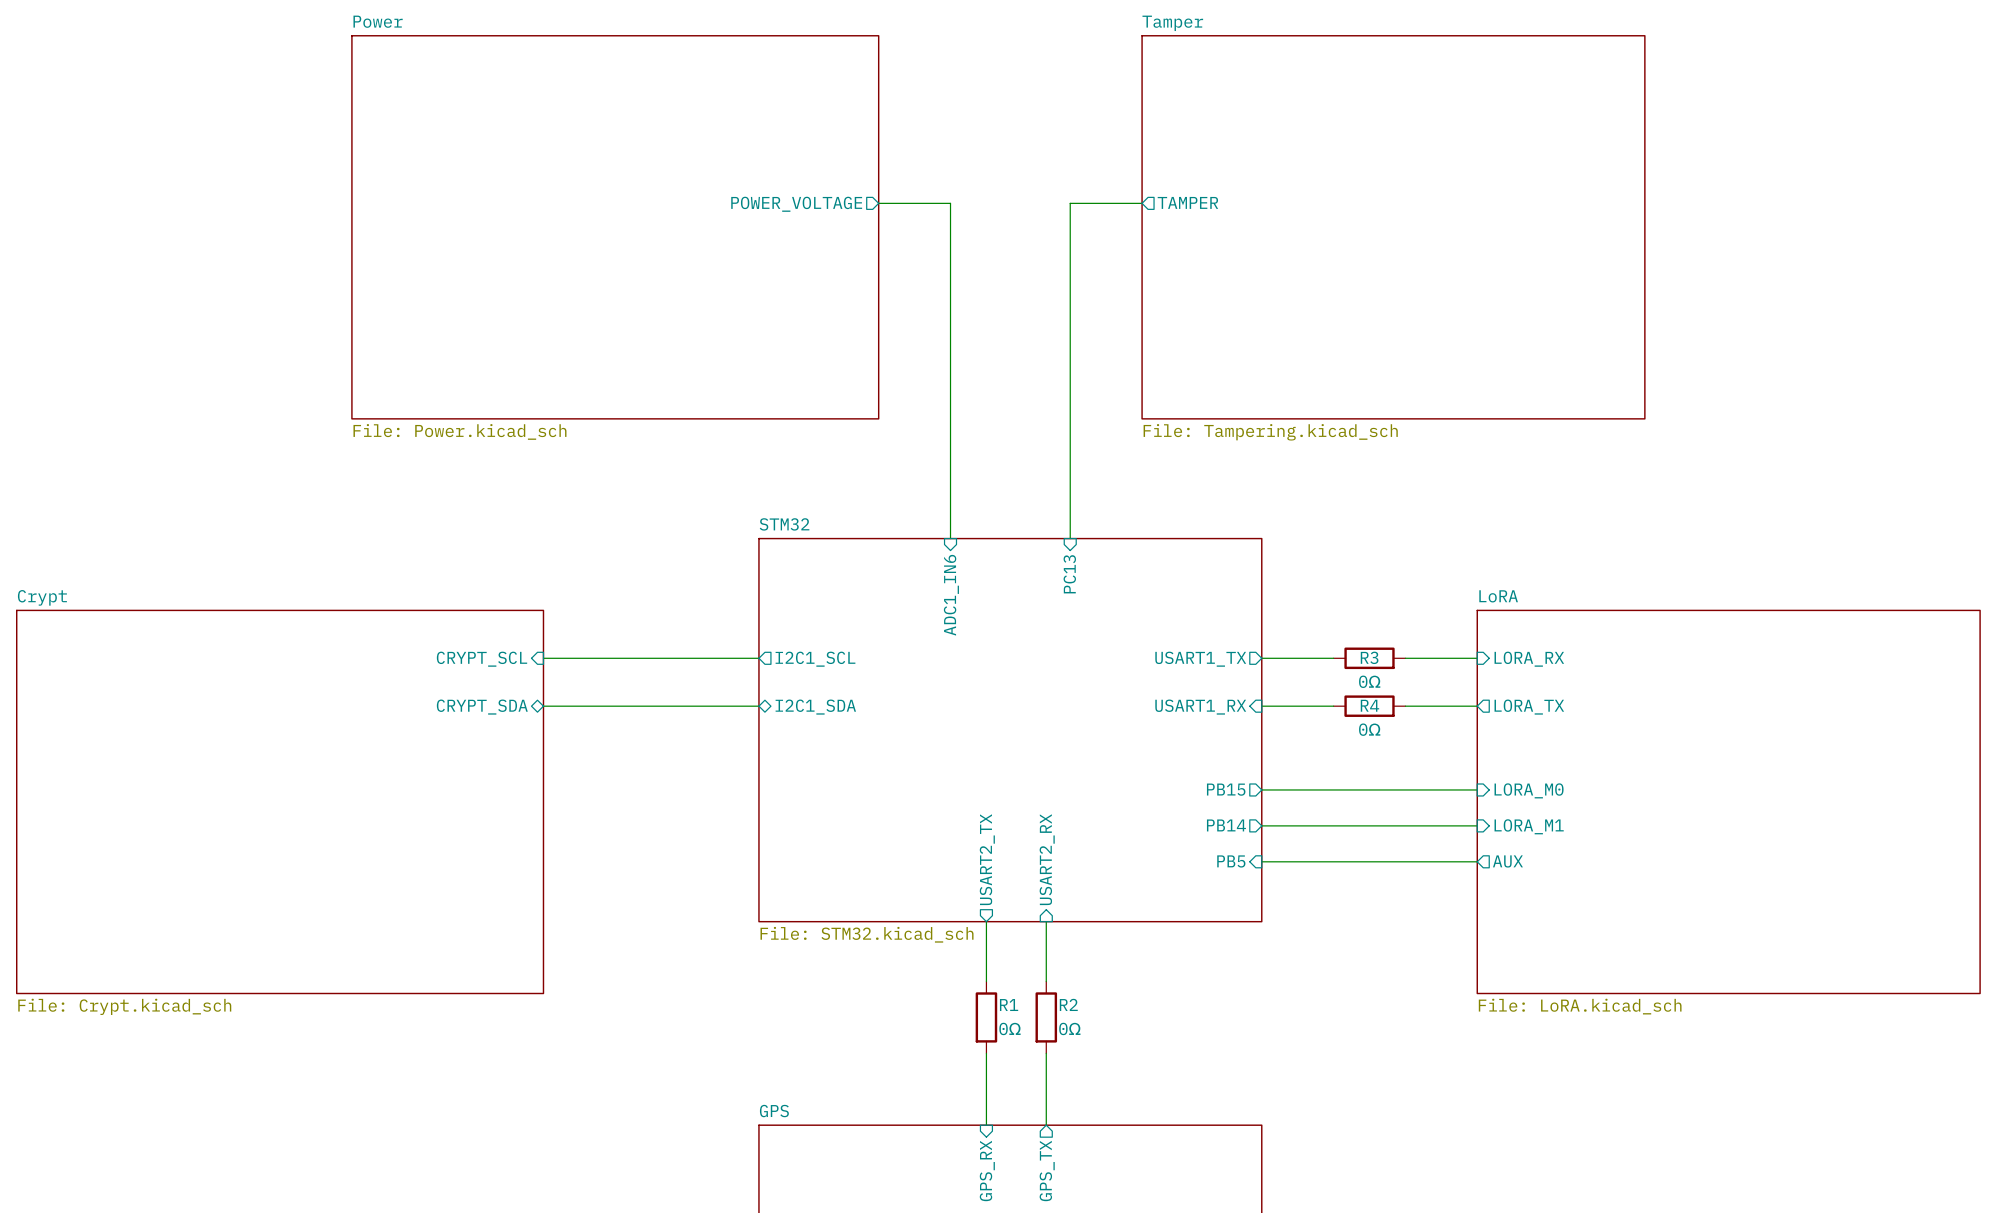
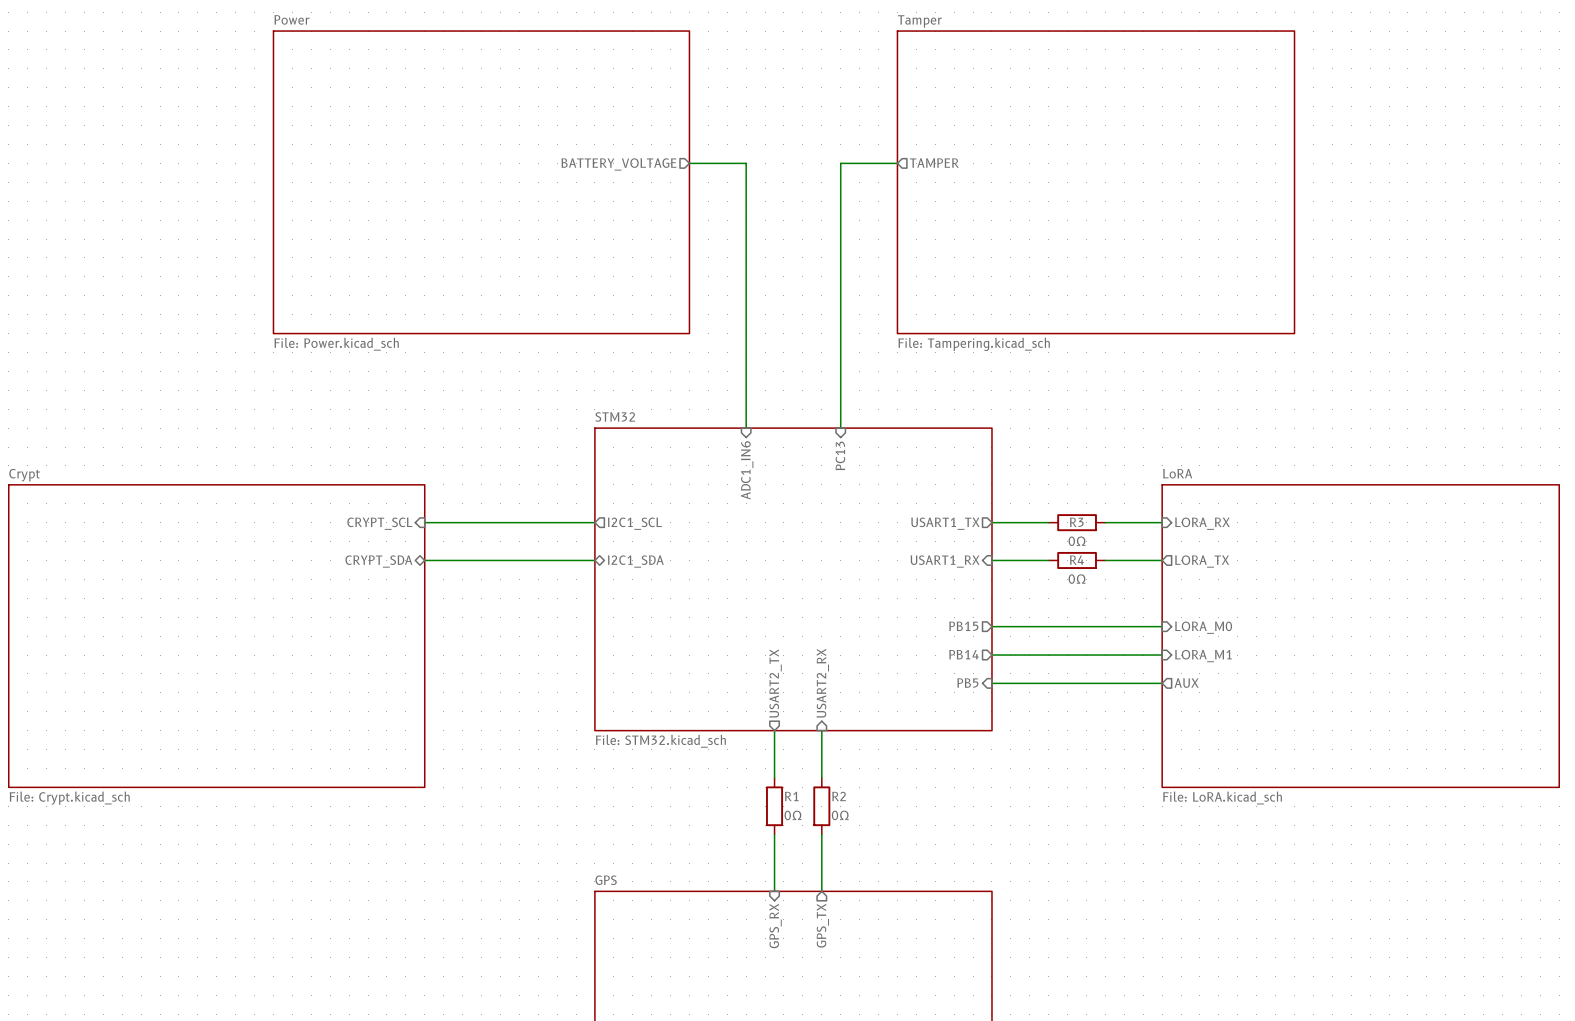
sheet pin: POWER_VOLTAGE (796, 204) -> BATTERY_VOLTAGE (618, 164)

